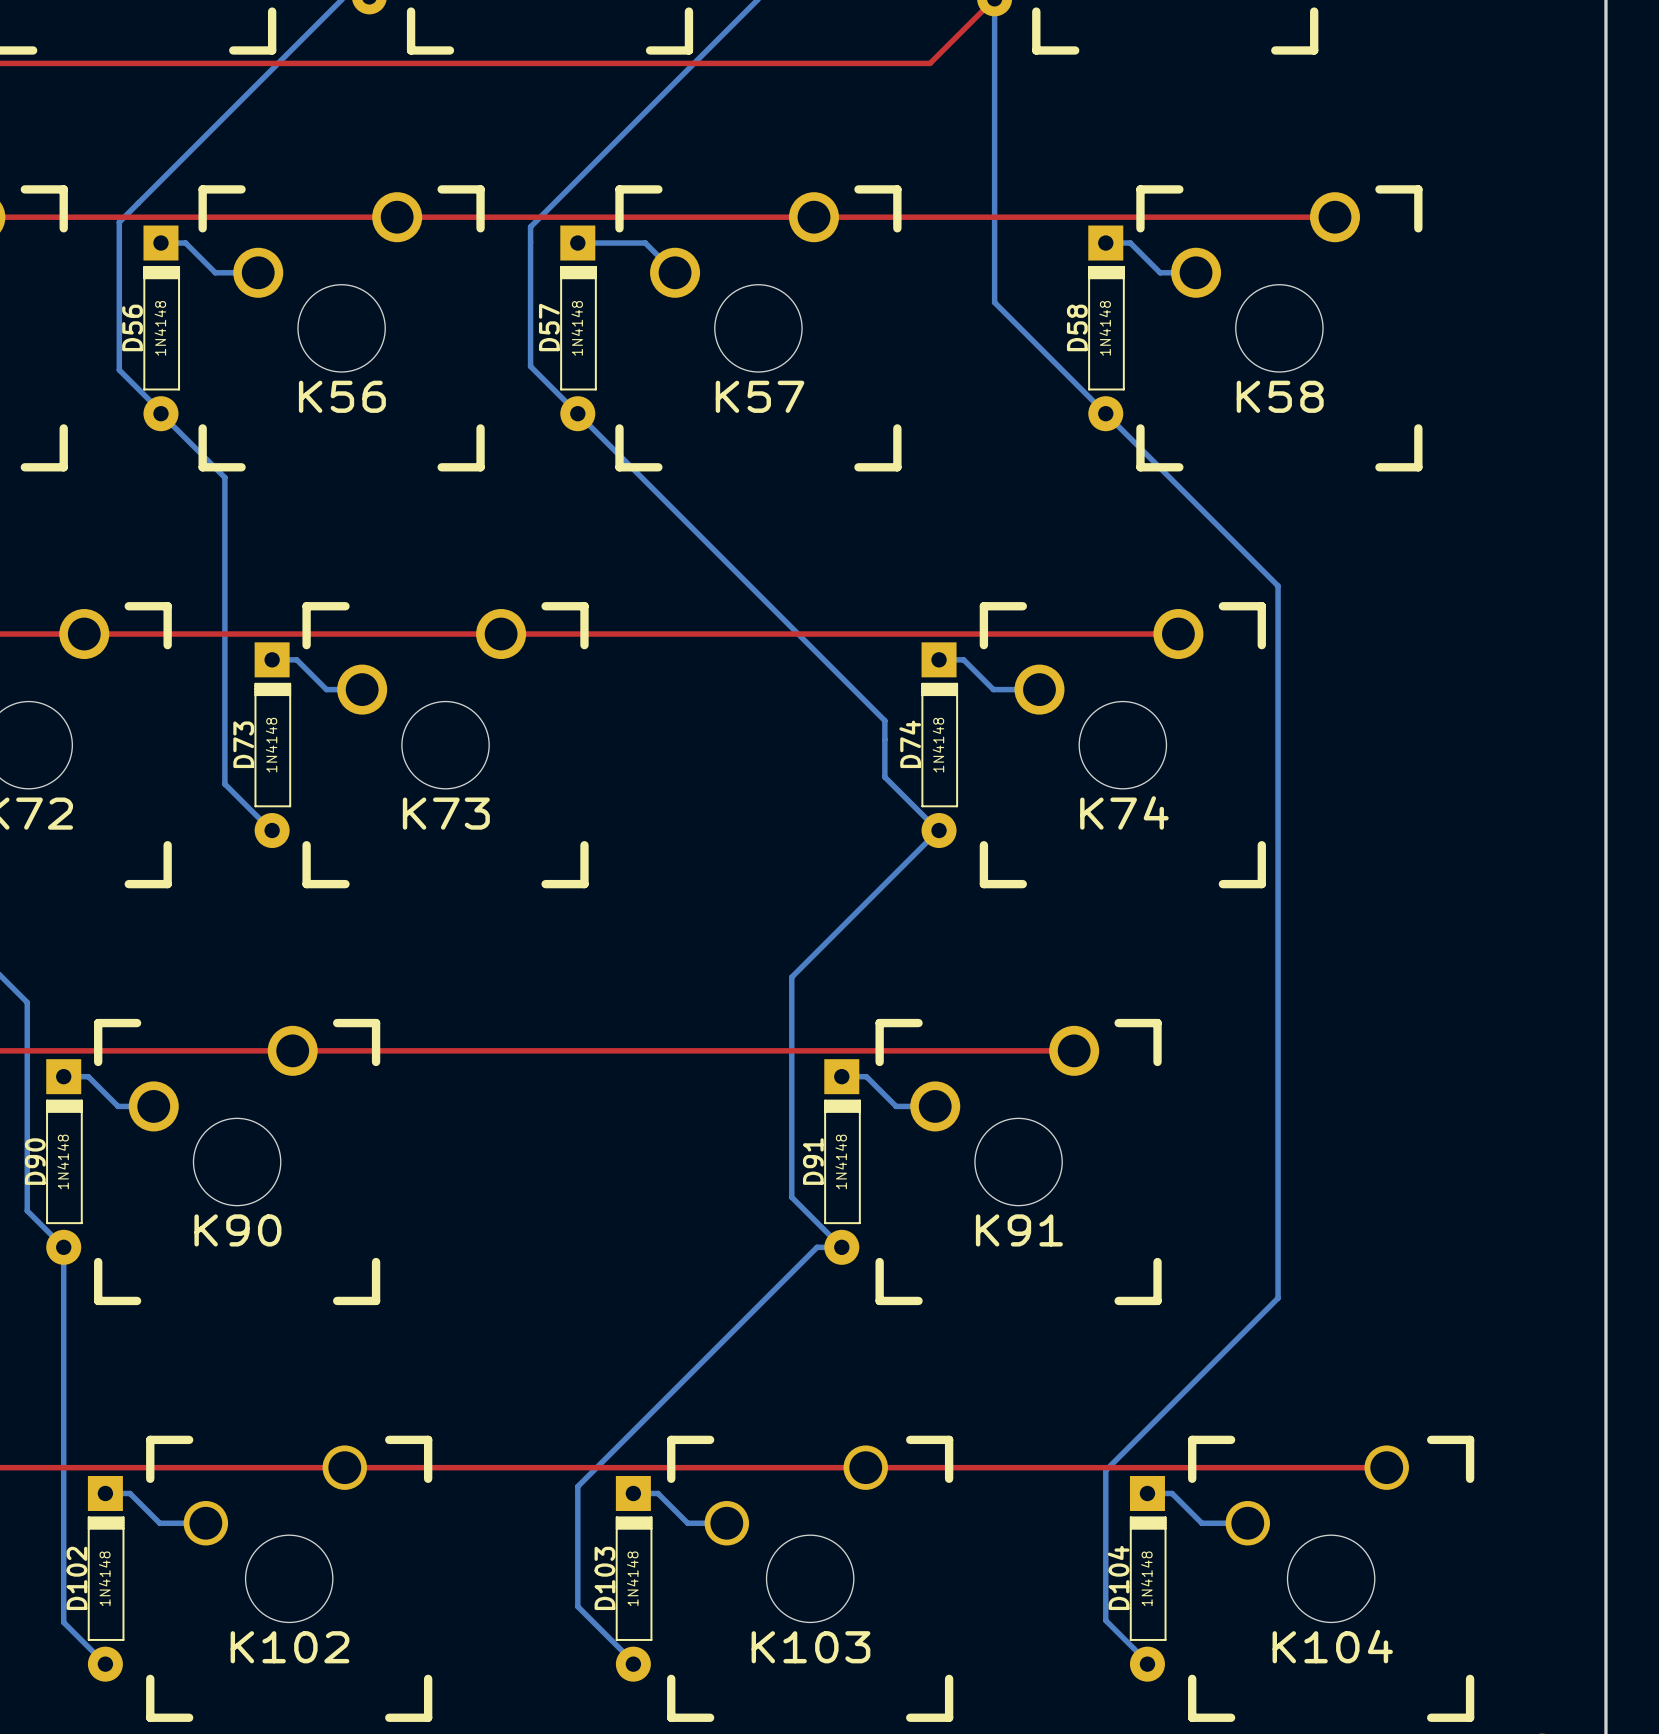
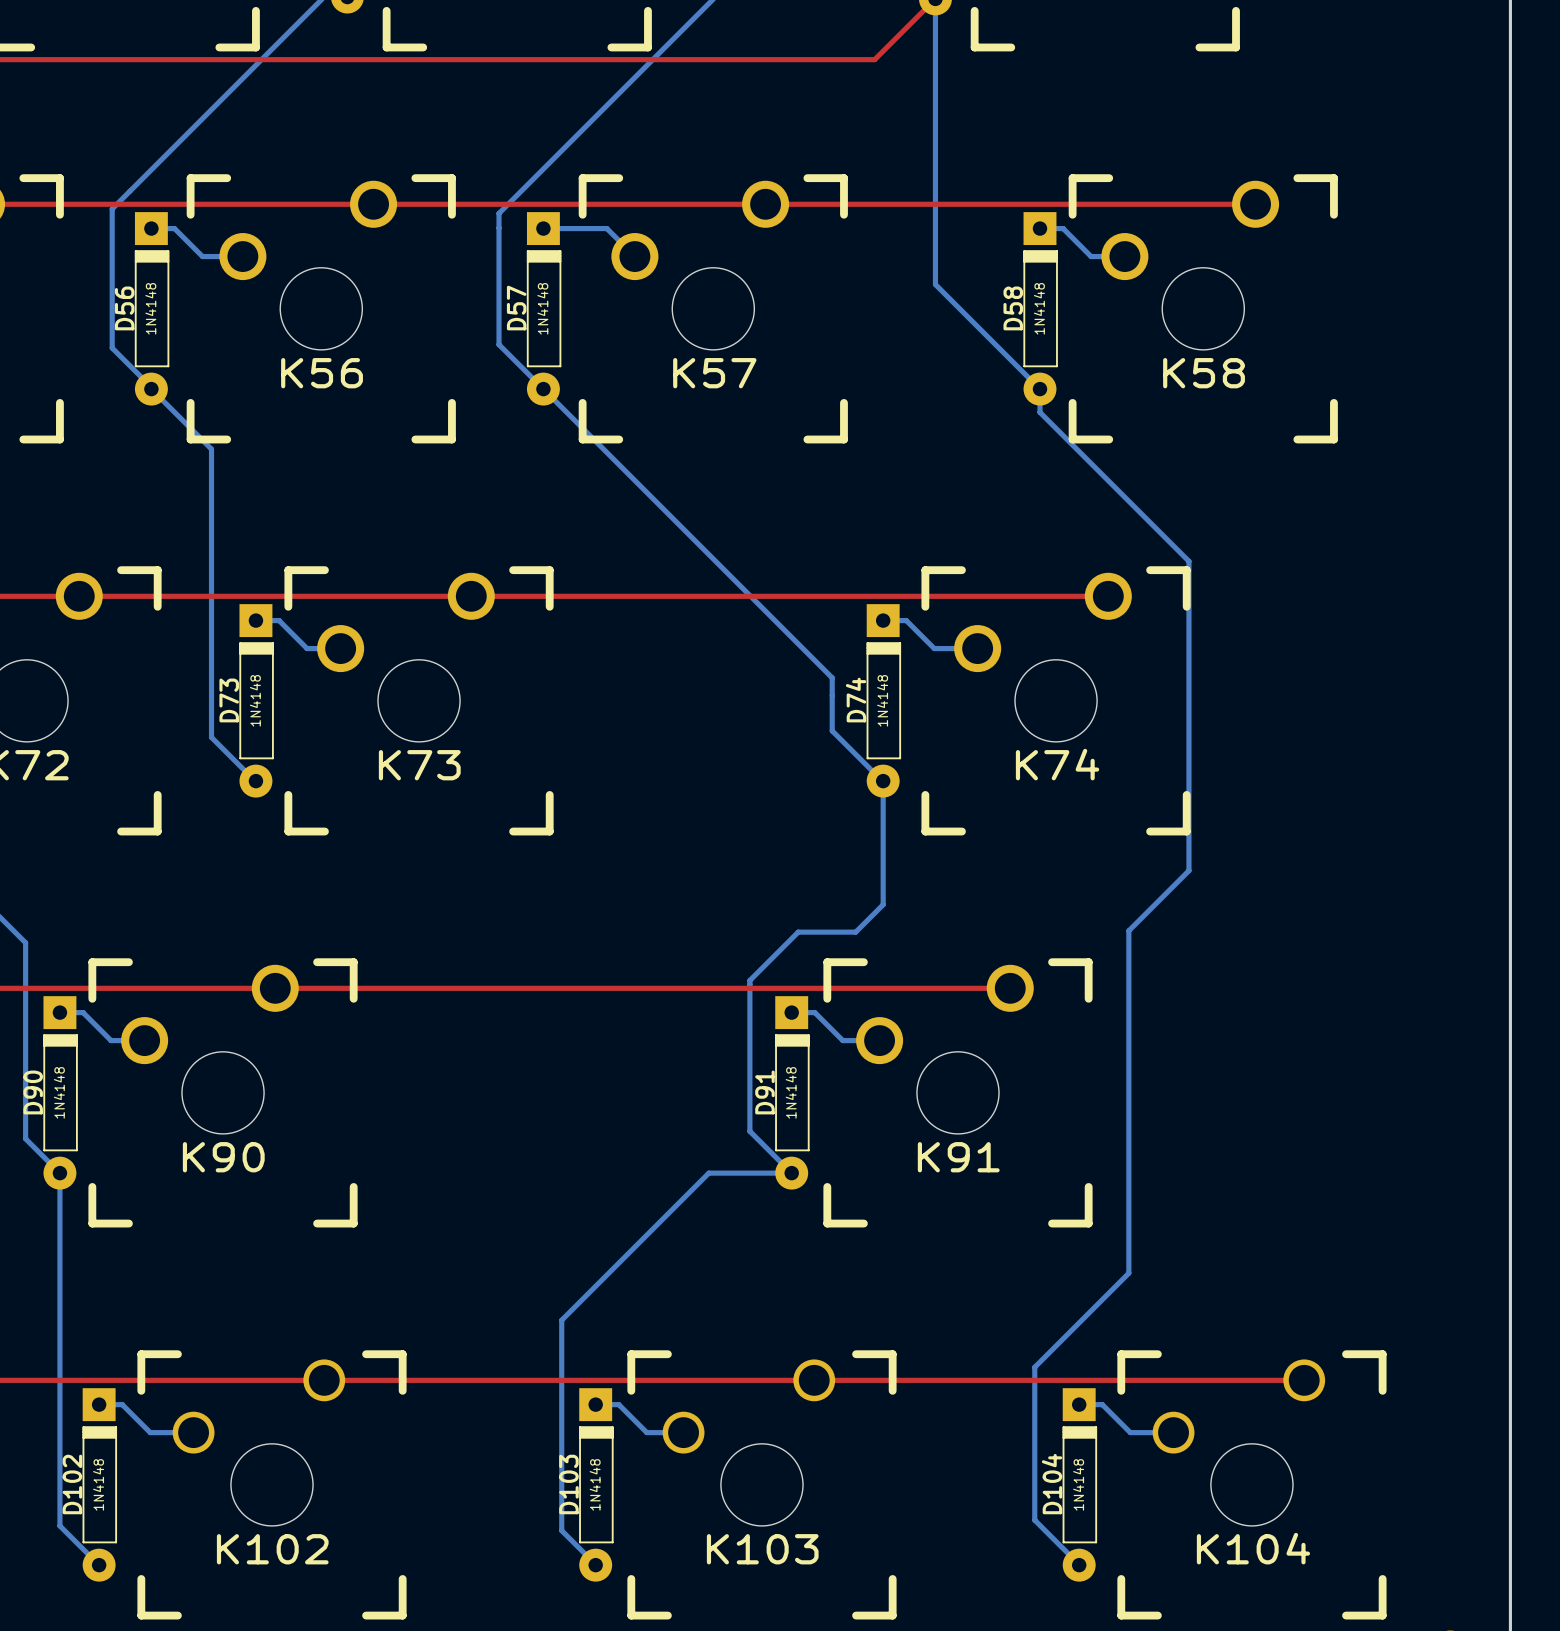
bottom track: (1105, 413) (1278, 585) (1278, 1298) (1105, 1470) (1105, 1620) (1150, 1664) -> (1039, 389) (1039, 412) (1188, 561) (1188, 870) (1128, 930) (1128, 1273) (1034, 1367) (1034, 1520) (1079, 1564)
bottom track: (939, 829) (791, 977) (791, 1197) (797, 1202) -> (883, 780) (883, 904) (855, 932) (798, 932) (749, 980) (749, 1131)
bottom track: (817, 1247) (577, 1486) (577, 1606) (633, 1662) -> (768, 1173) (708, 1173) (561, 1320) (561, 1530) (595, 1564)

